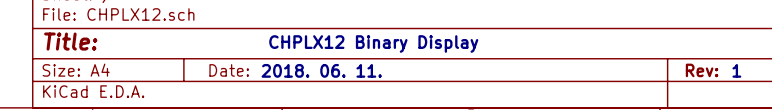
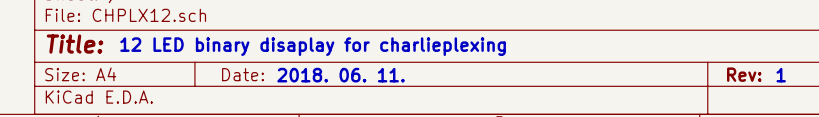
text: CHPLX12 Binary Display (373, 43) -> 12 LED binary disaplay for charlieplexing (313, 46)

